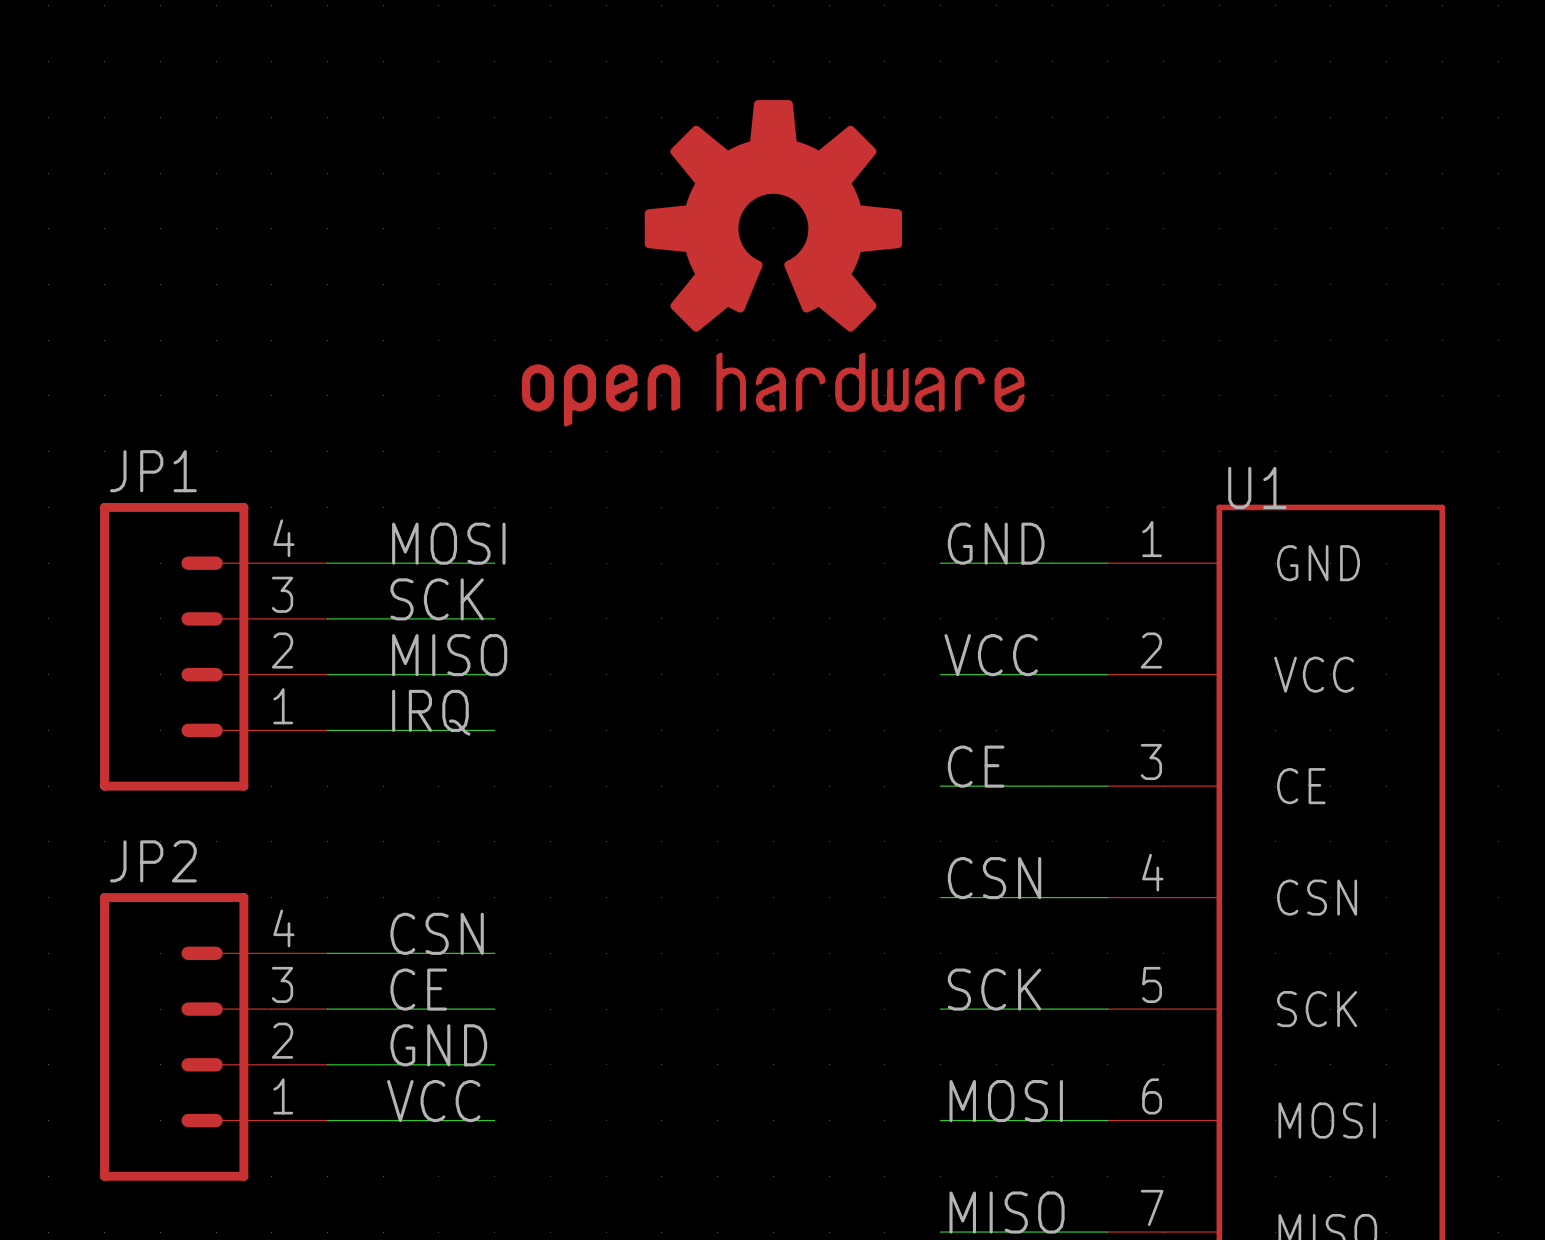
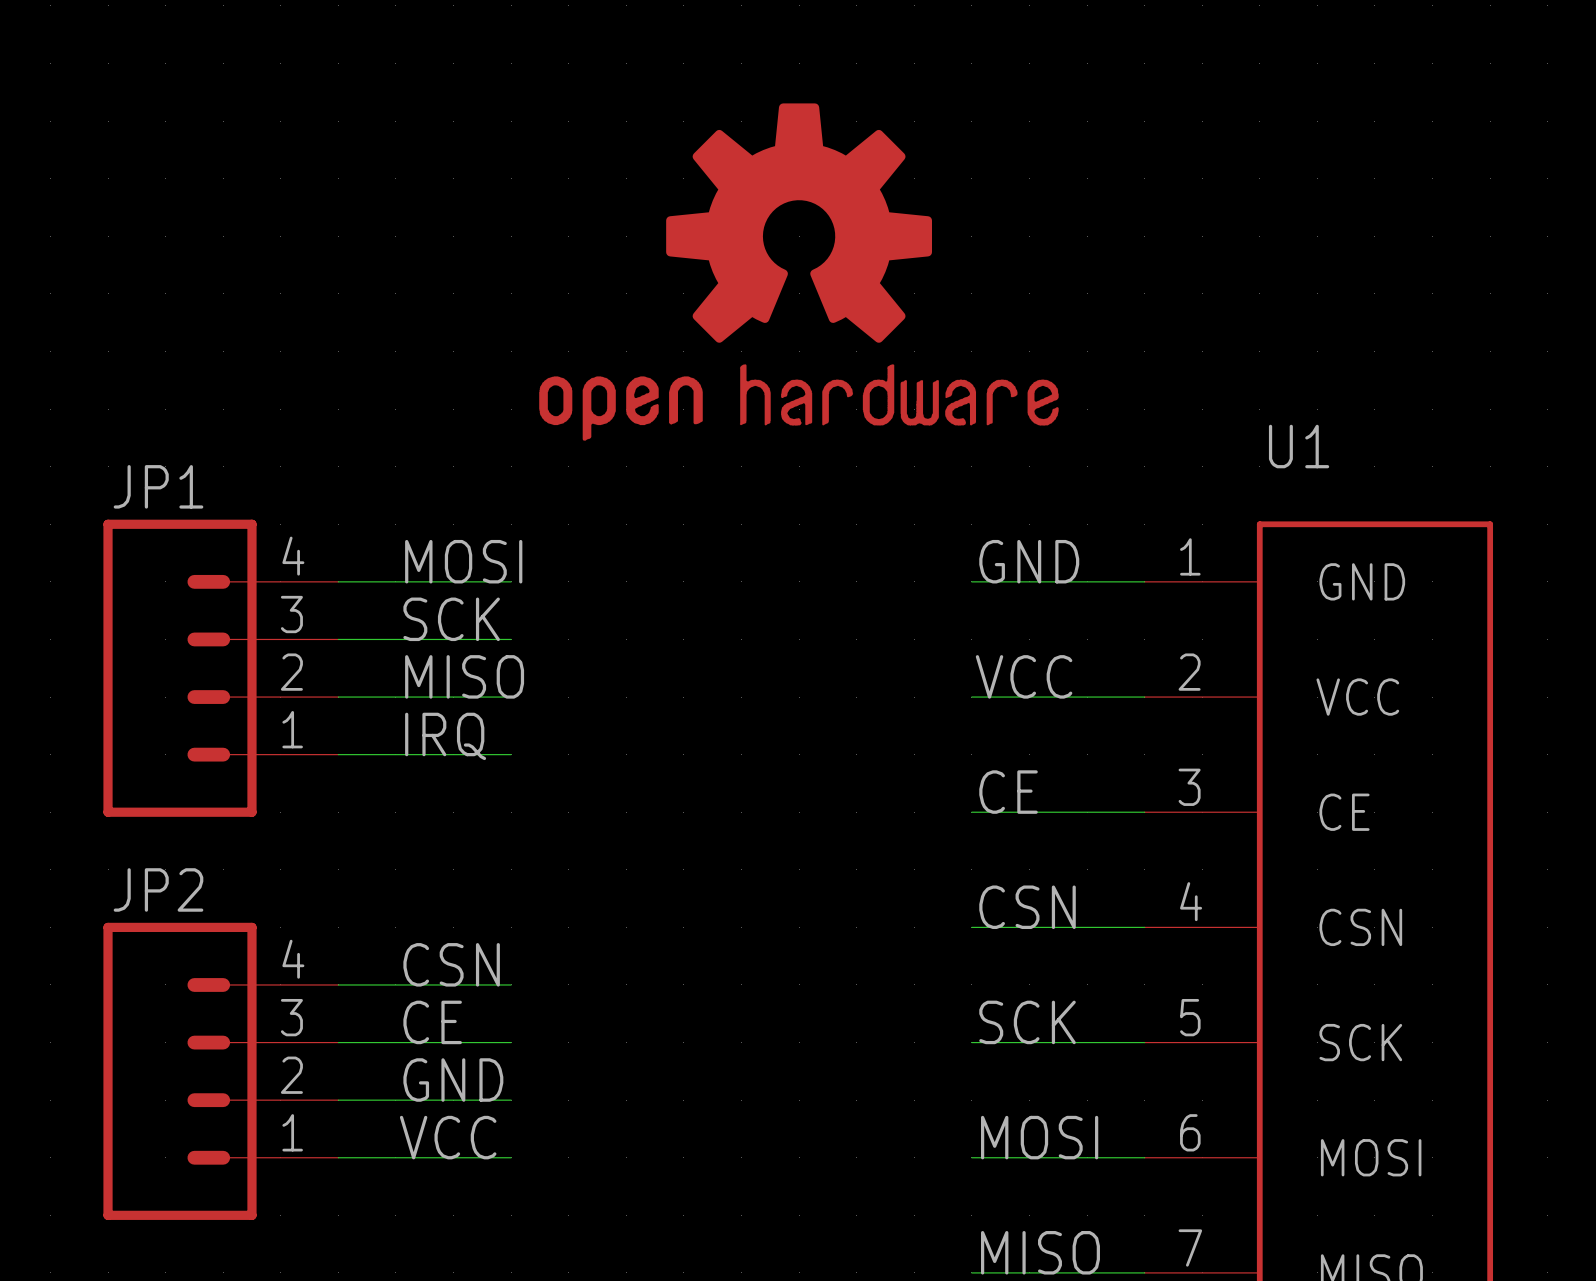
U1 name position: U1 (1257, 487) -> U1 (1299, 446)

